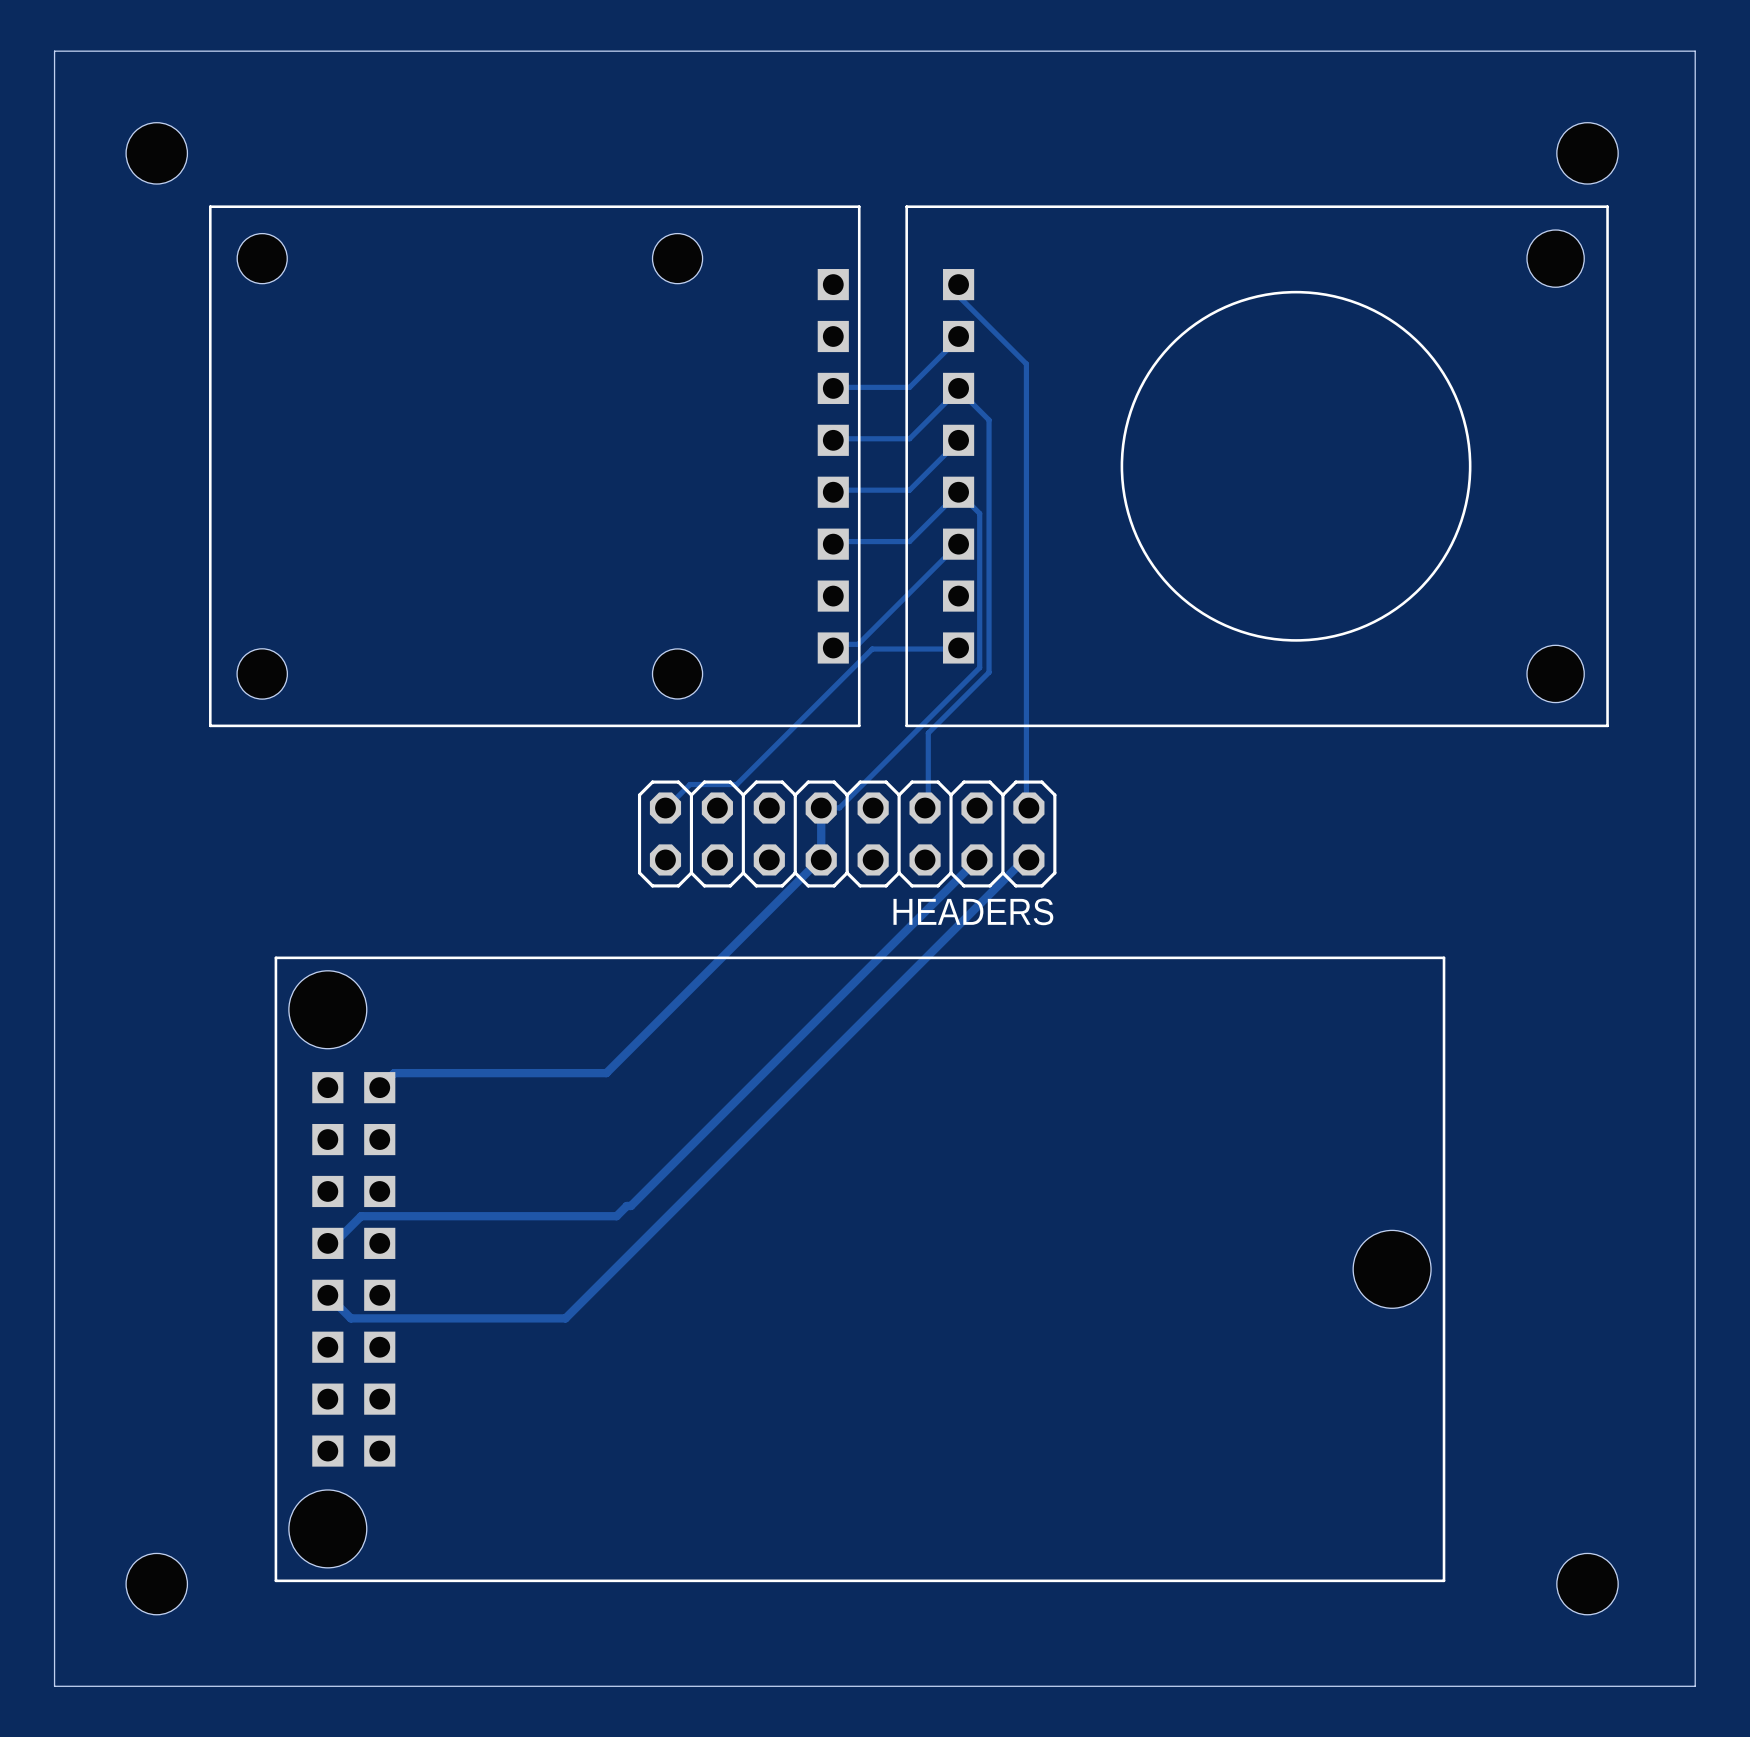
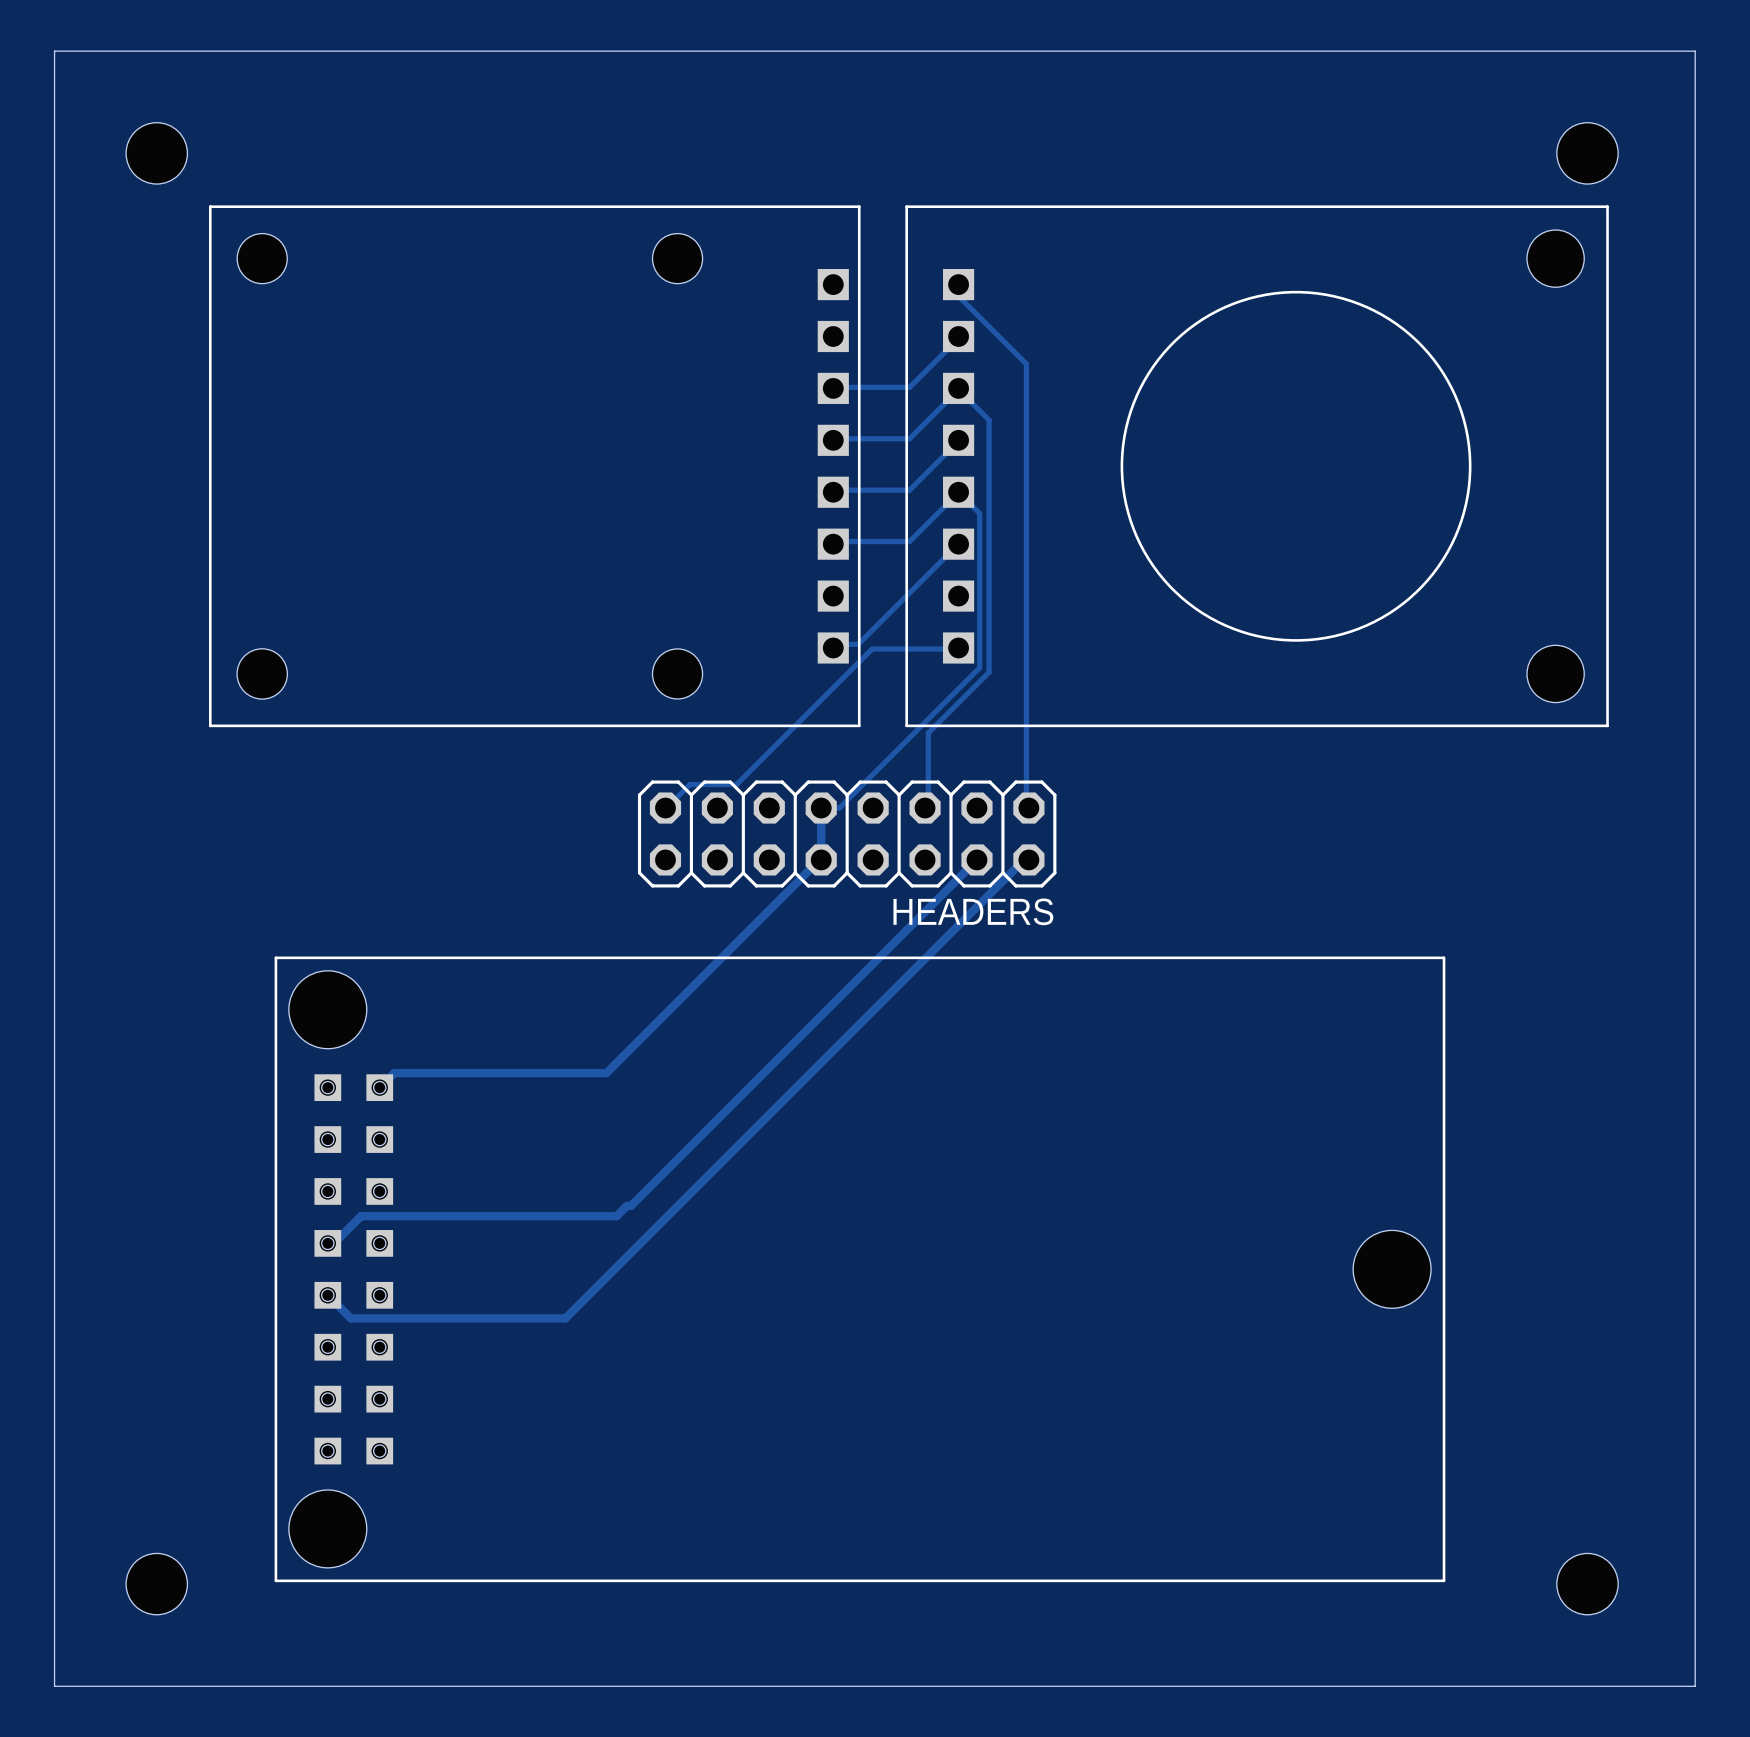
part footprint: [274, 956, 1446, 1583] -> [274, 956, 1446, 1583]

